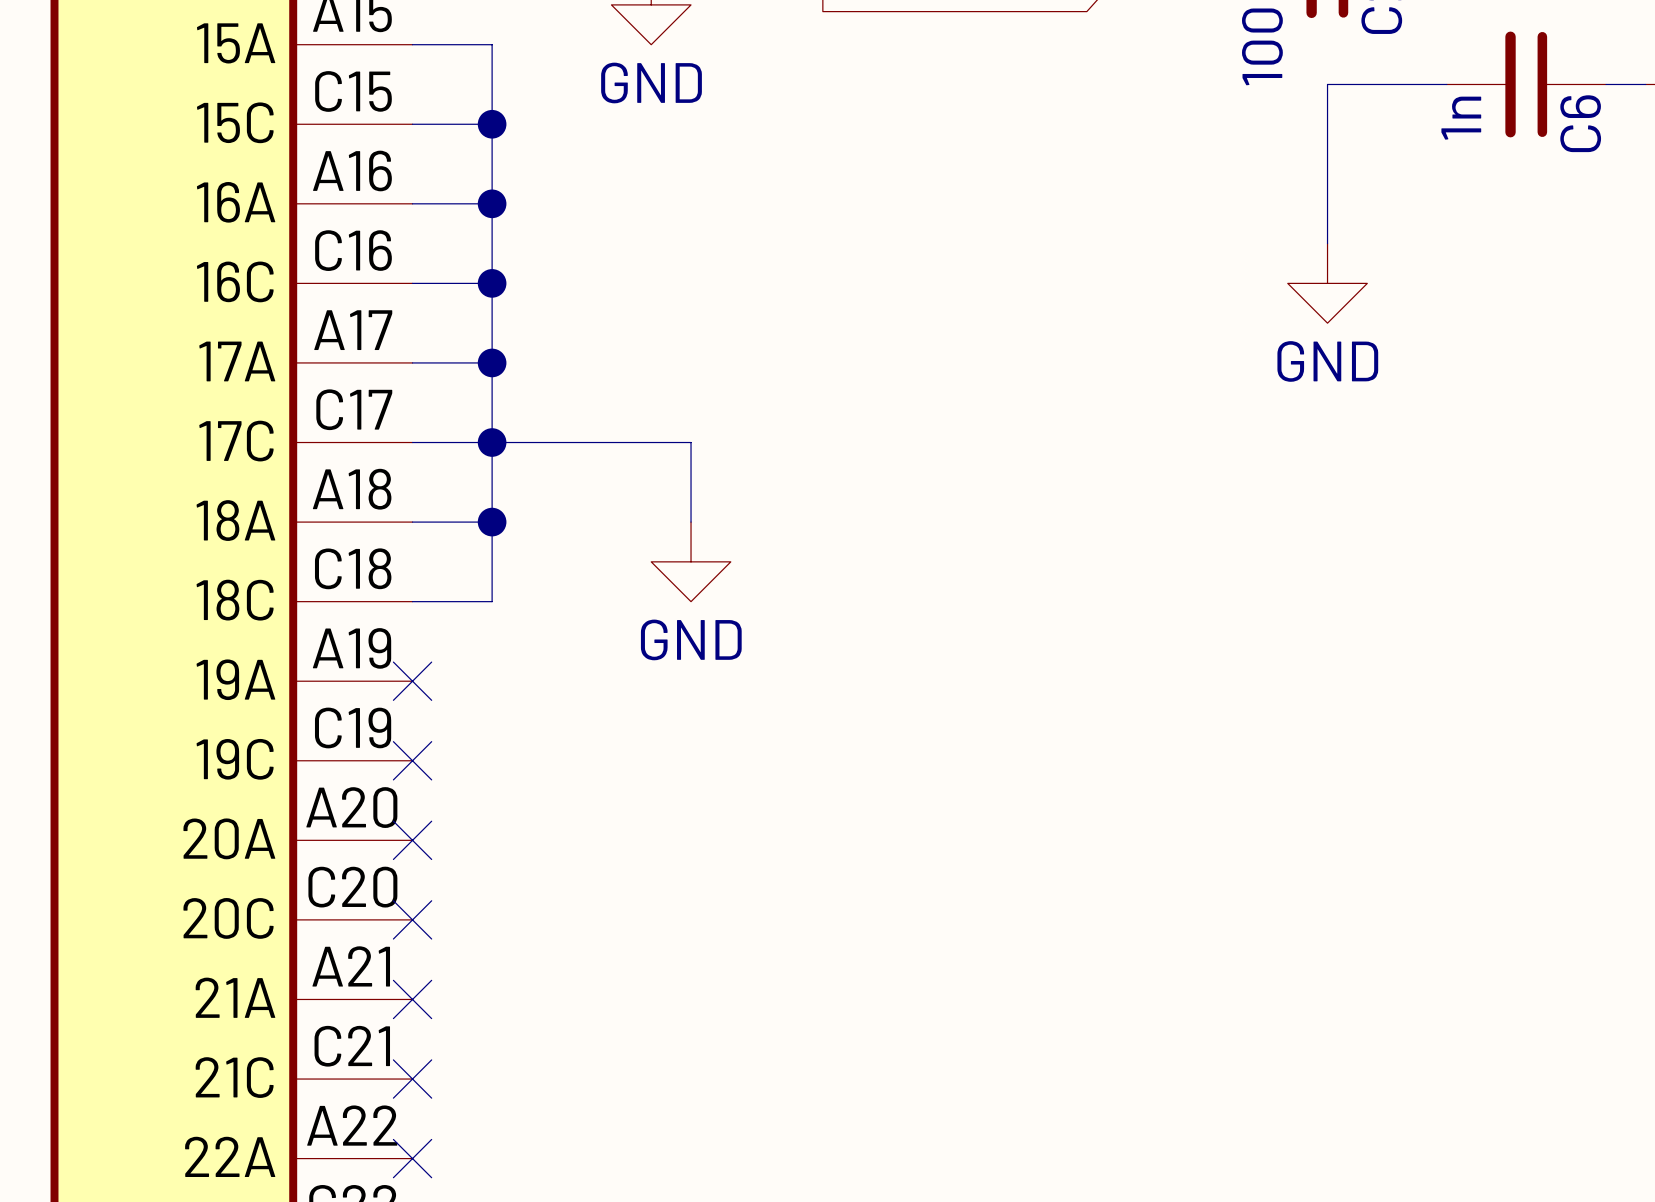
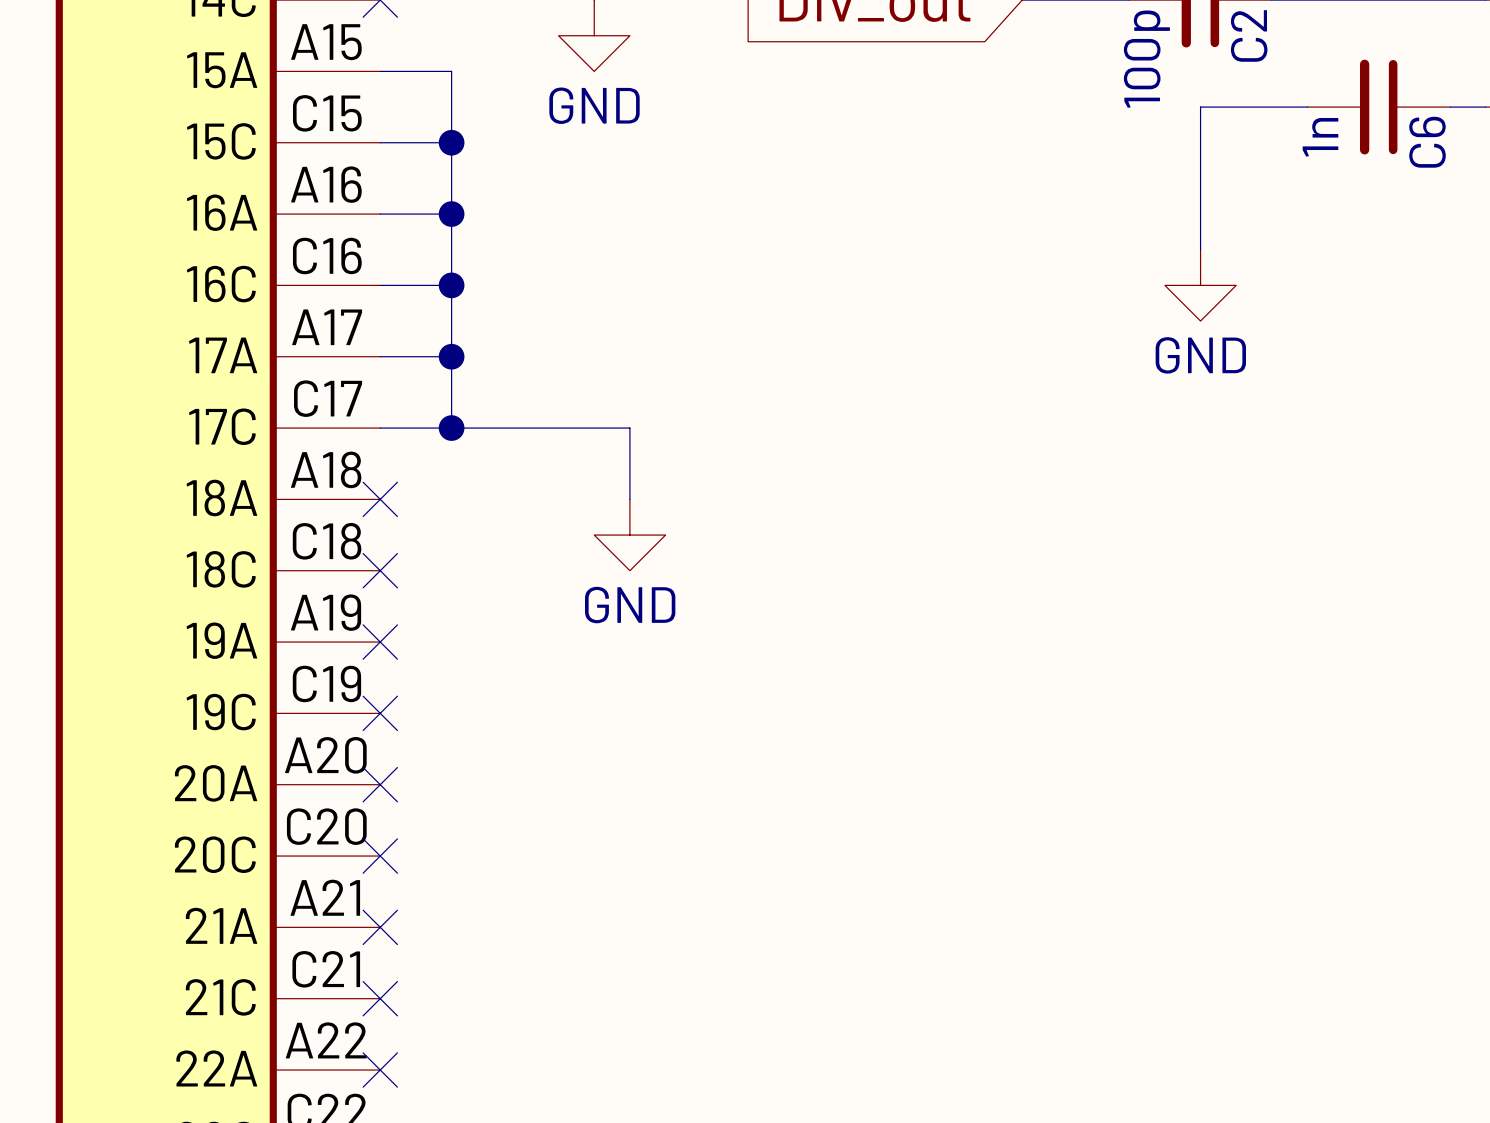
wire: (492, 442) (492, 601) (412, 601) -> none
wire: (412, 522) (492, 522) -> none
no-connect mark: none -> (380, 499)
junction: (492, 522) -> none
no-connect mark: none -> (380, 570)

